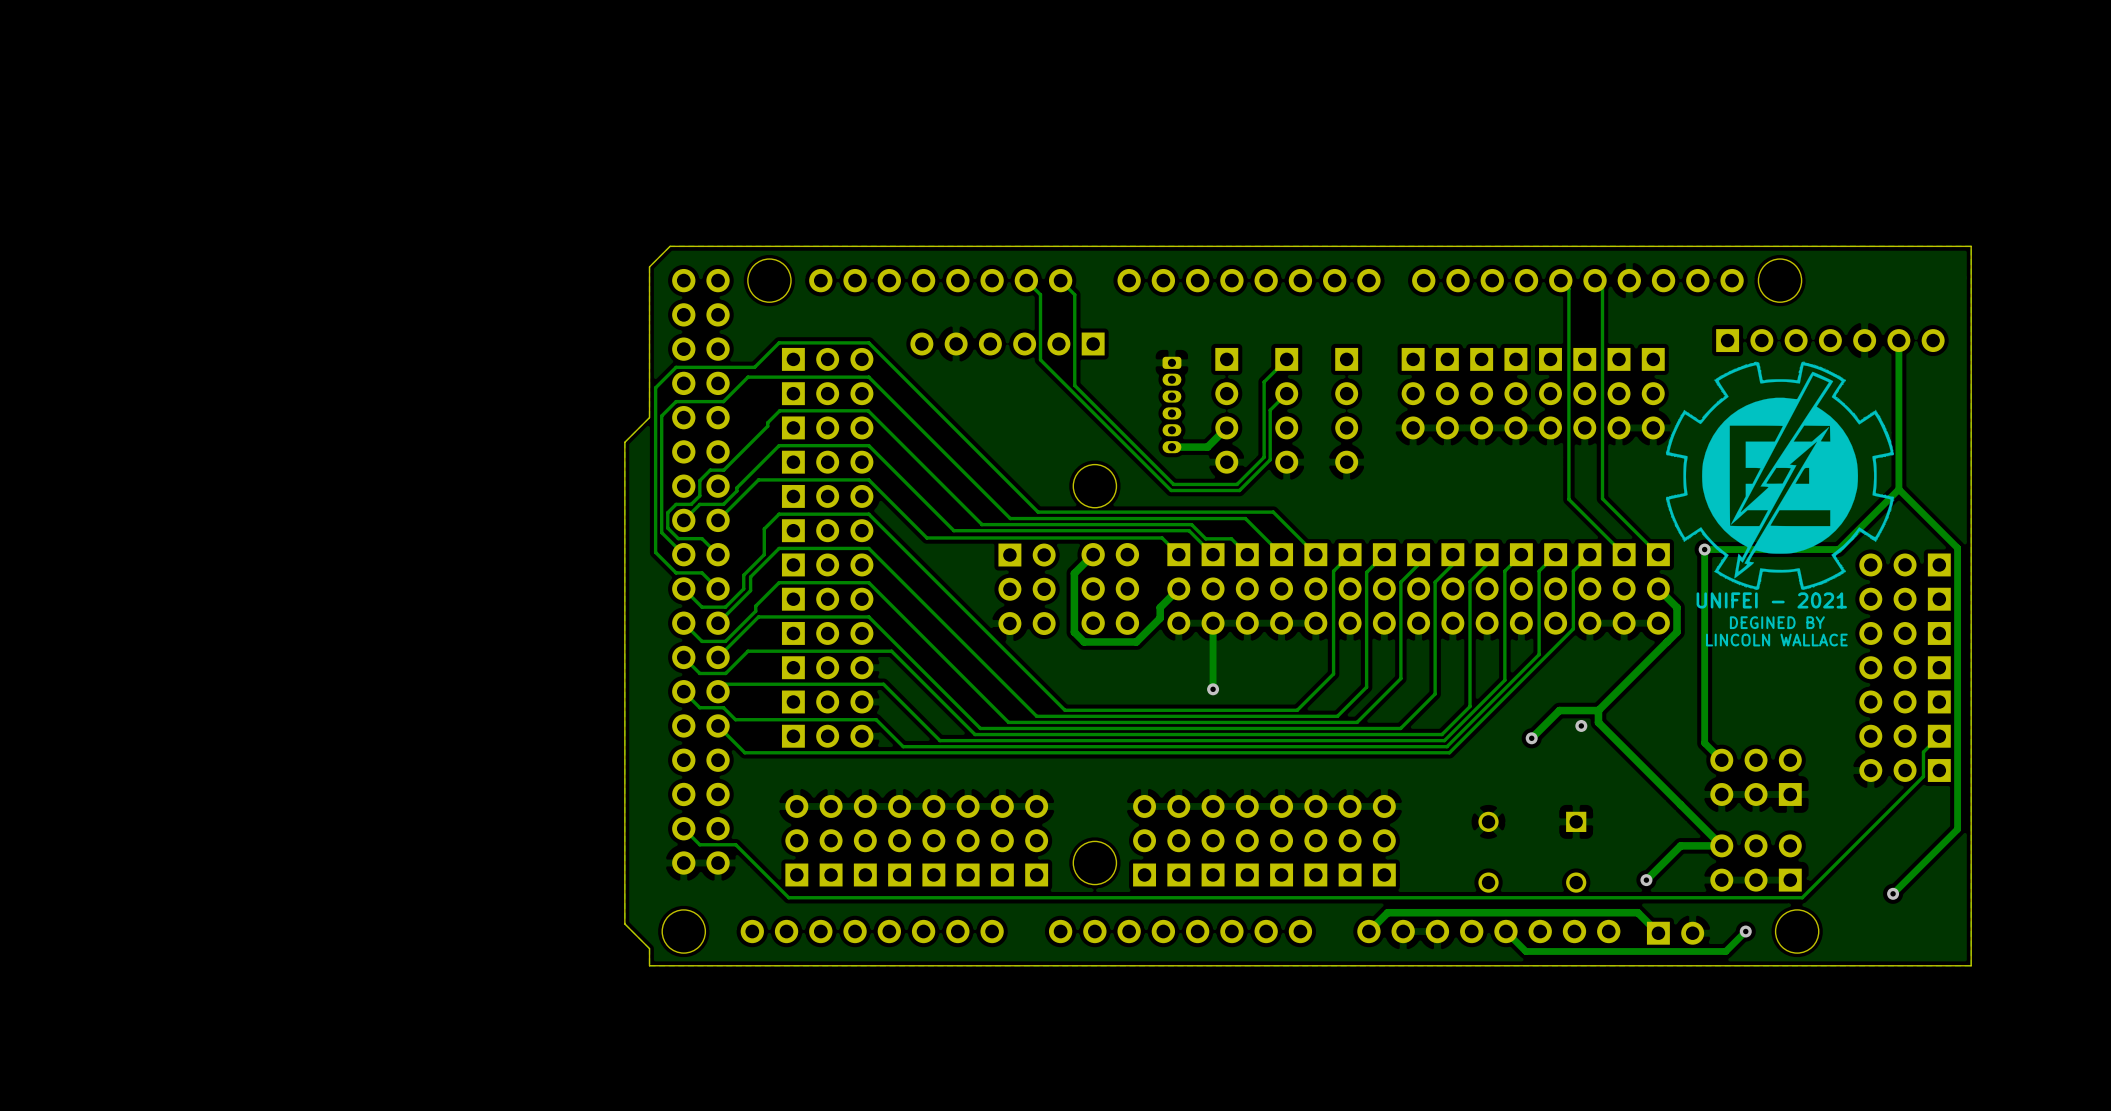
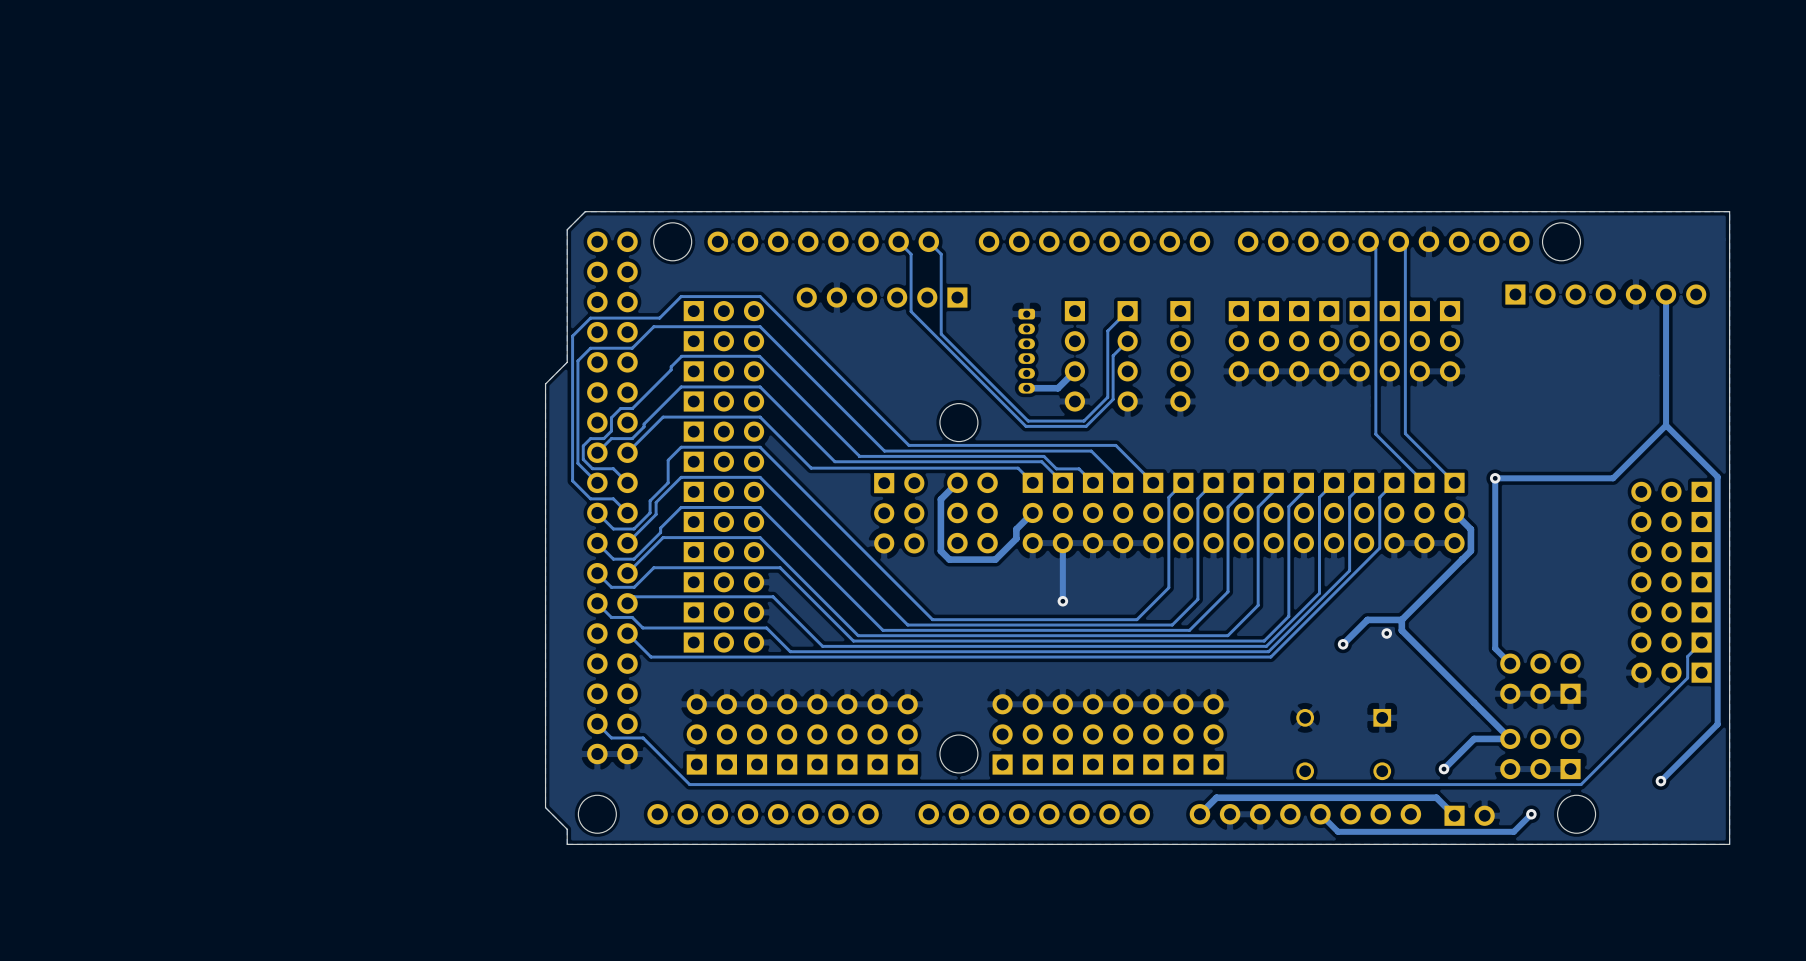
drawing: [1665, 361, 1895, 591] -> none
text: UNIFEI - 2021 (1771, 600) -> none
text: DEGINED BY (1777, 622) -> none
text: LINCOLN WALLACE (1776, 640) -> none

